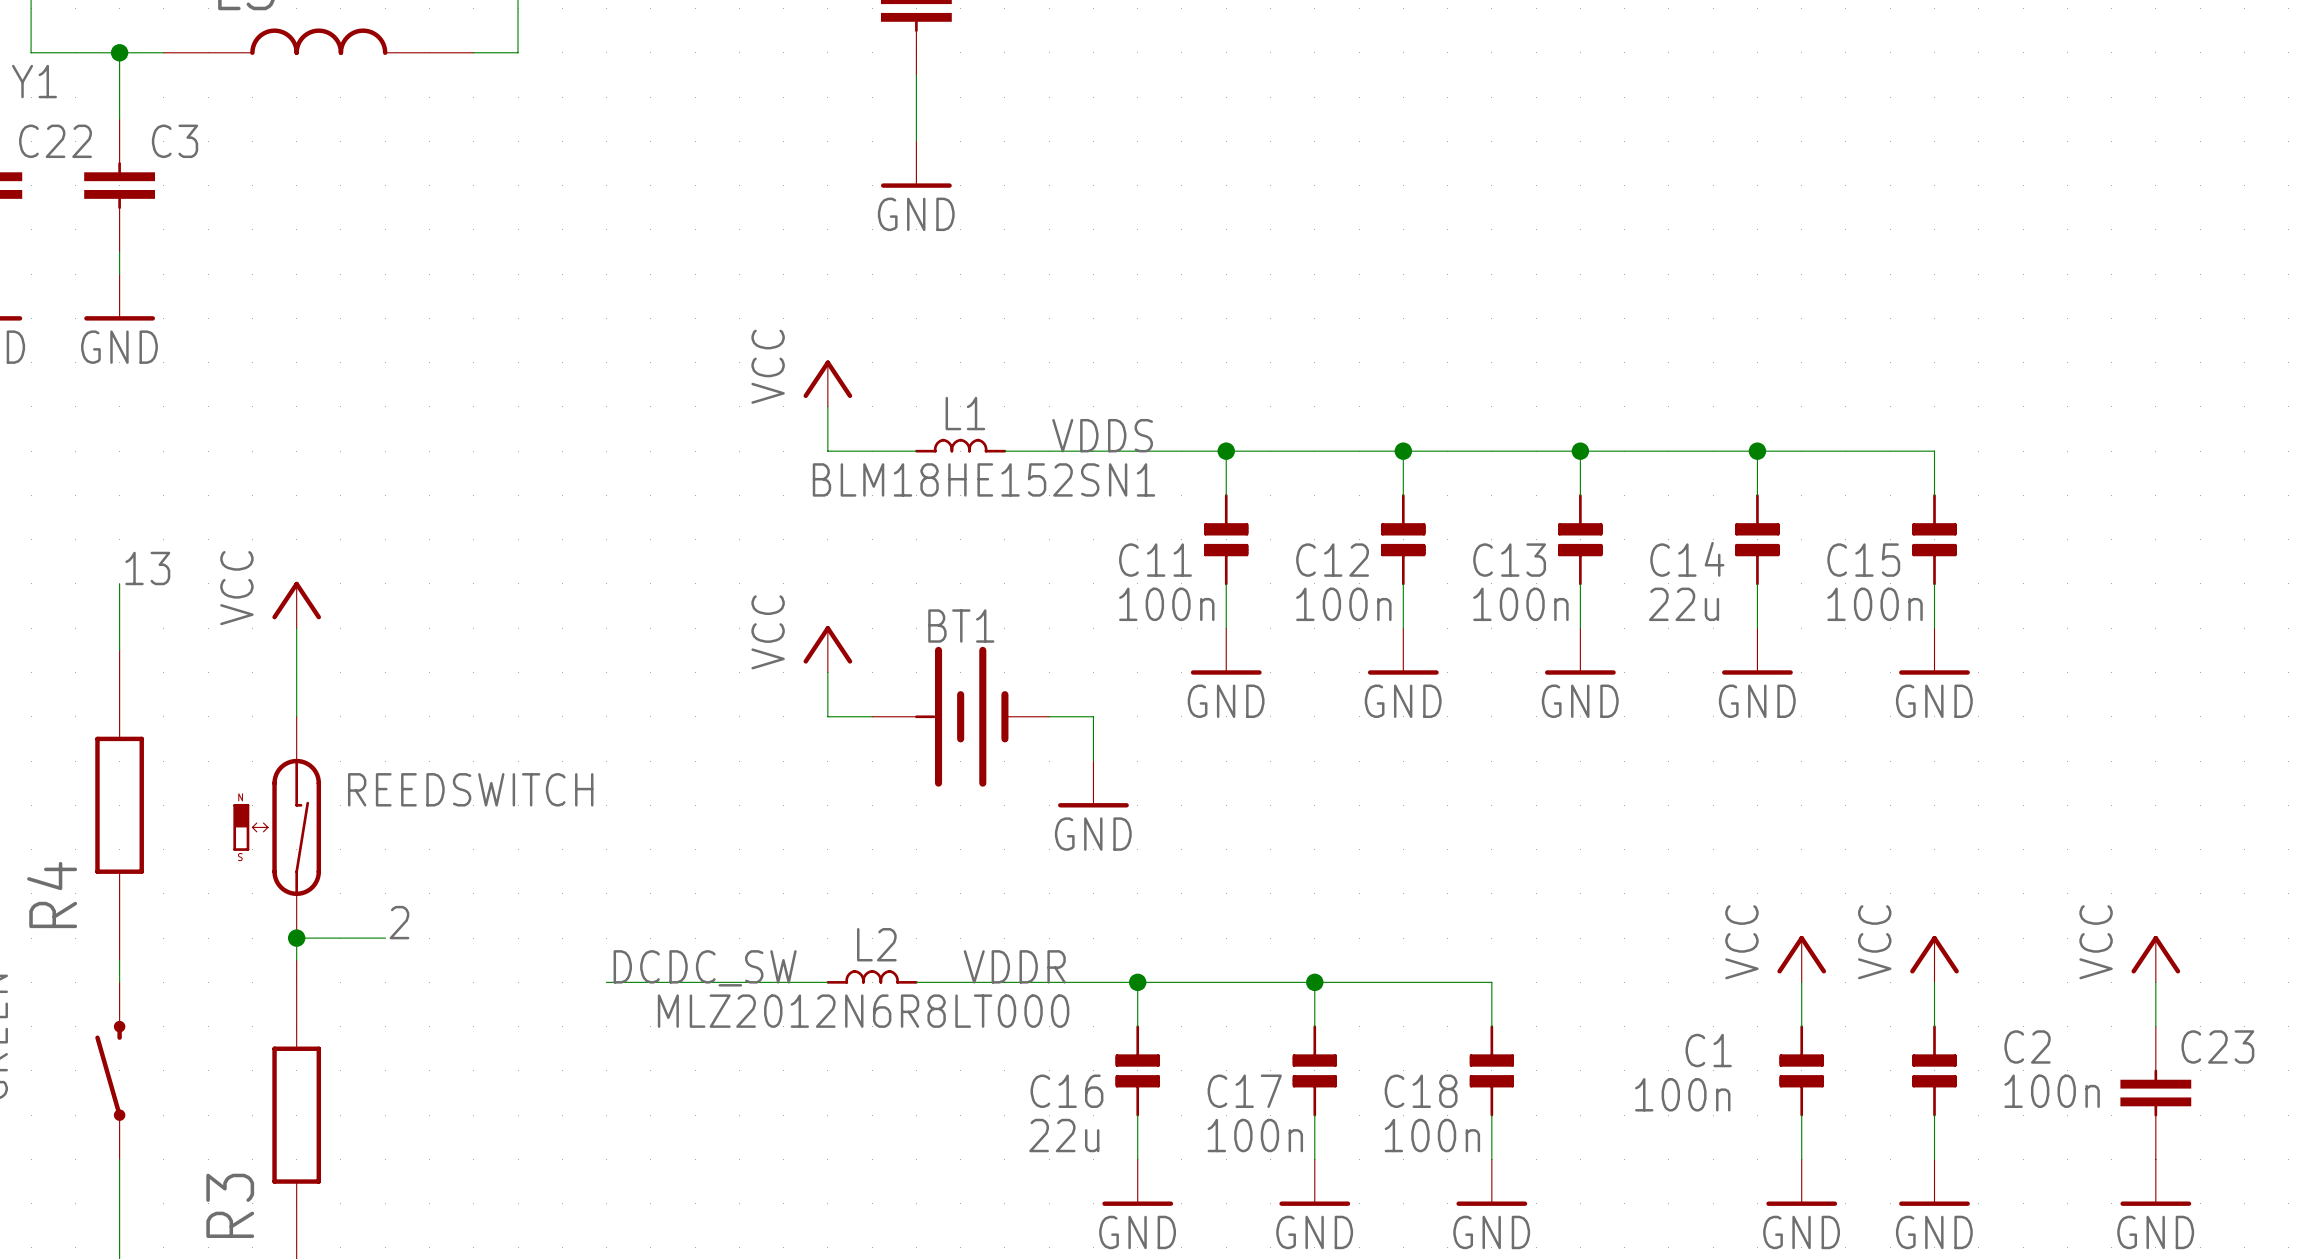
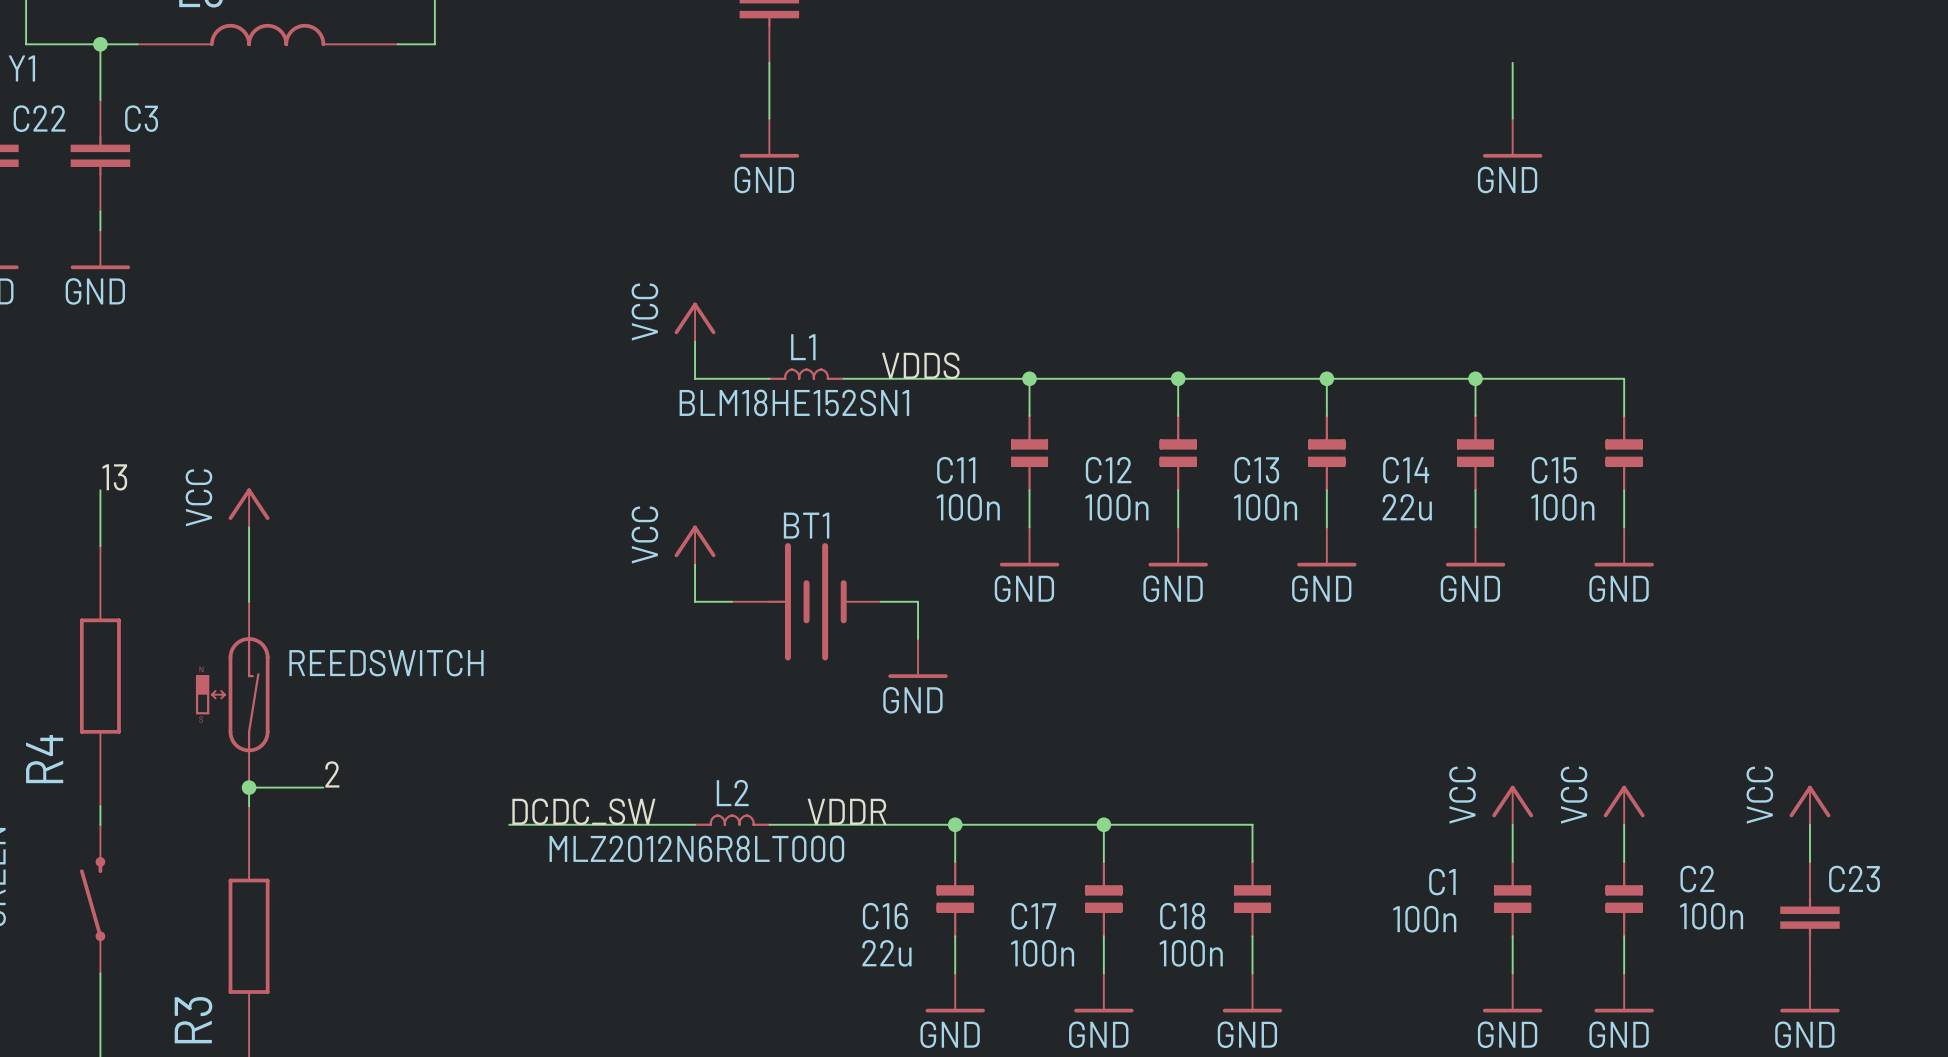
wire: none -> (1512, 62) (1512, 118)
power symbol: none -> GND (1512, 138)

